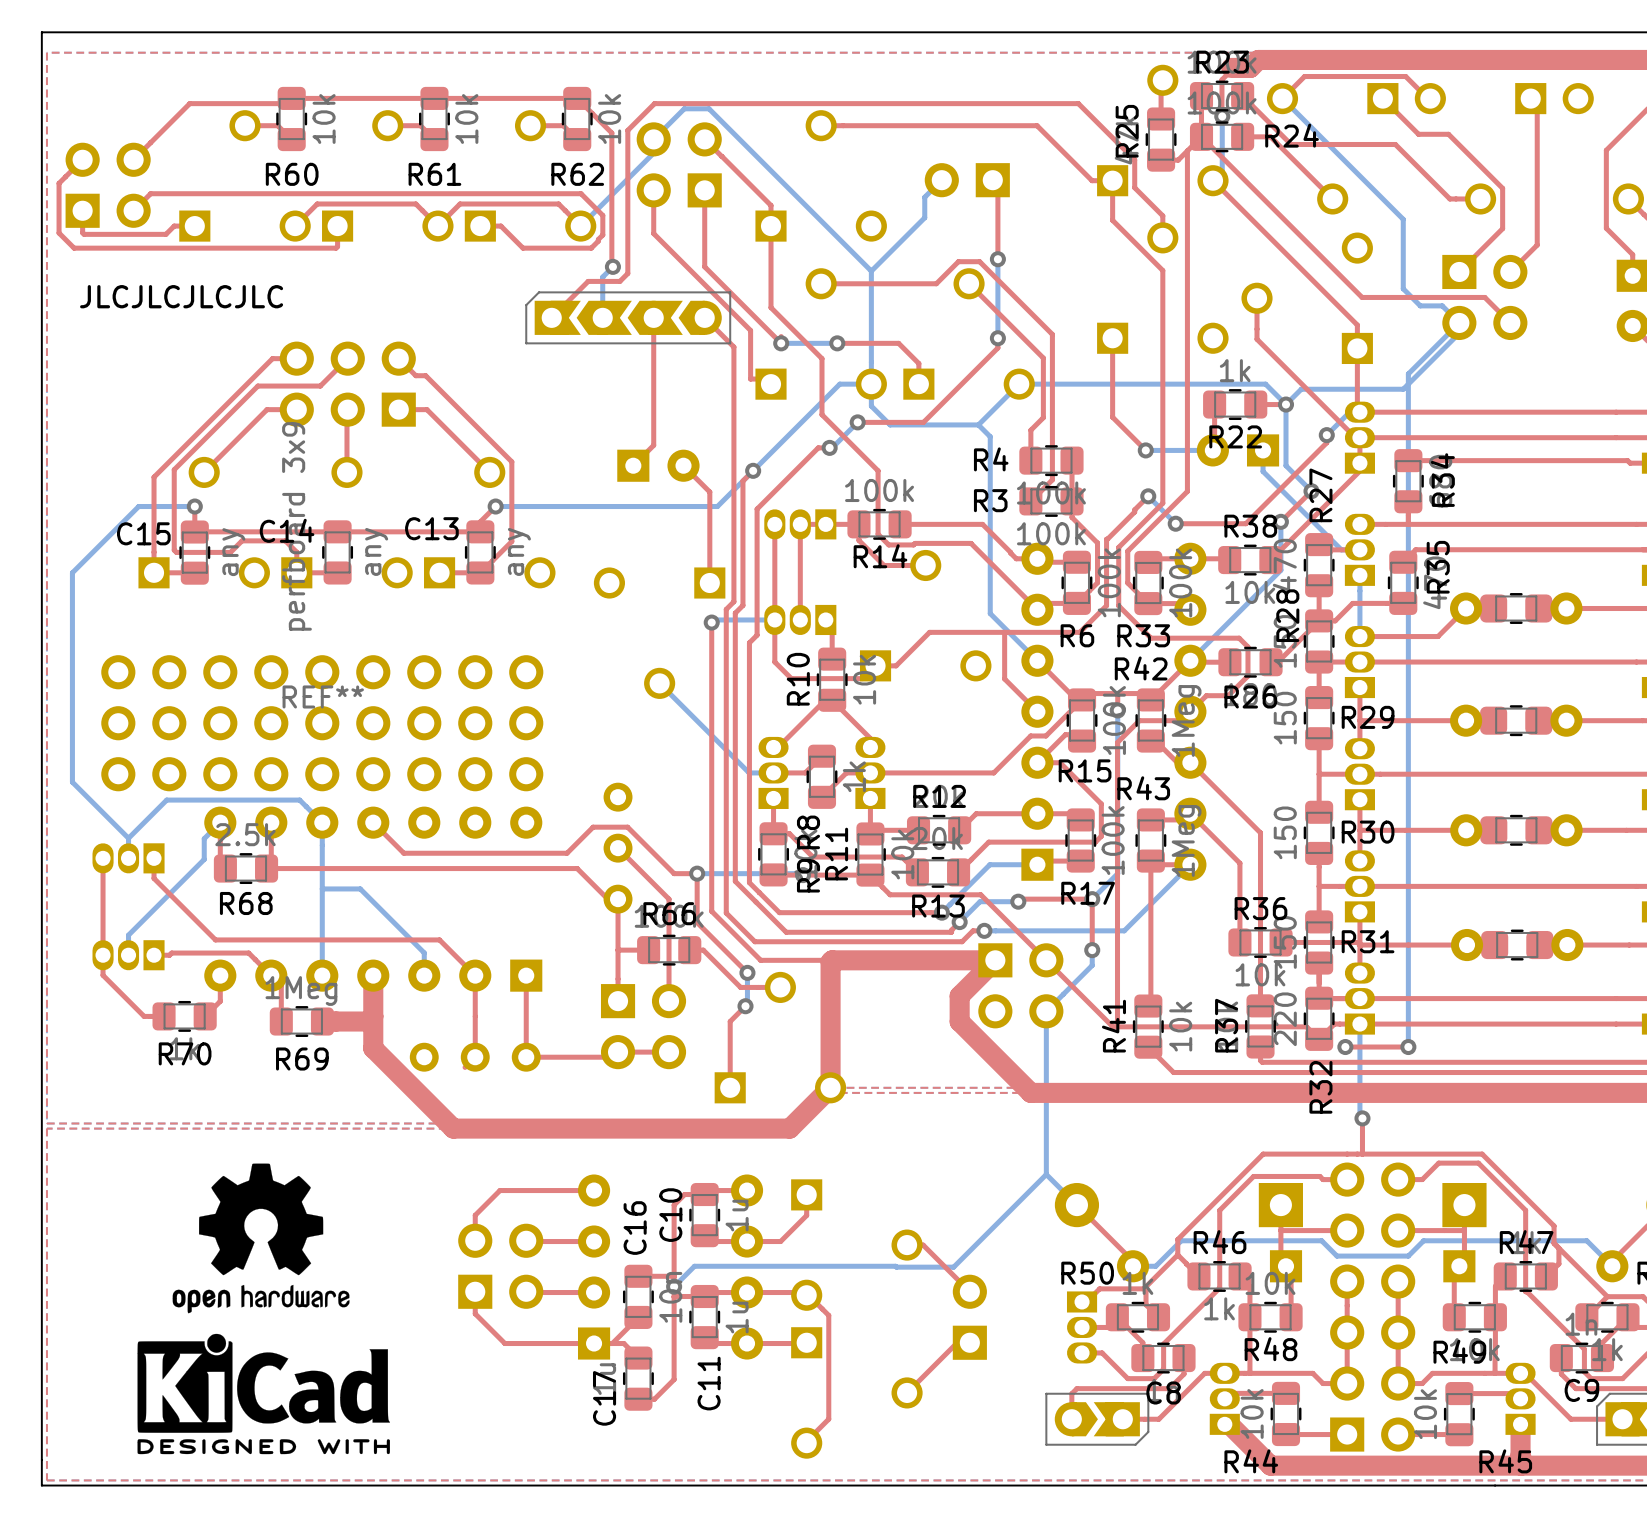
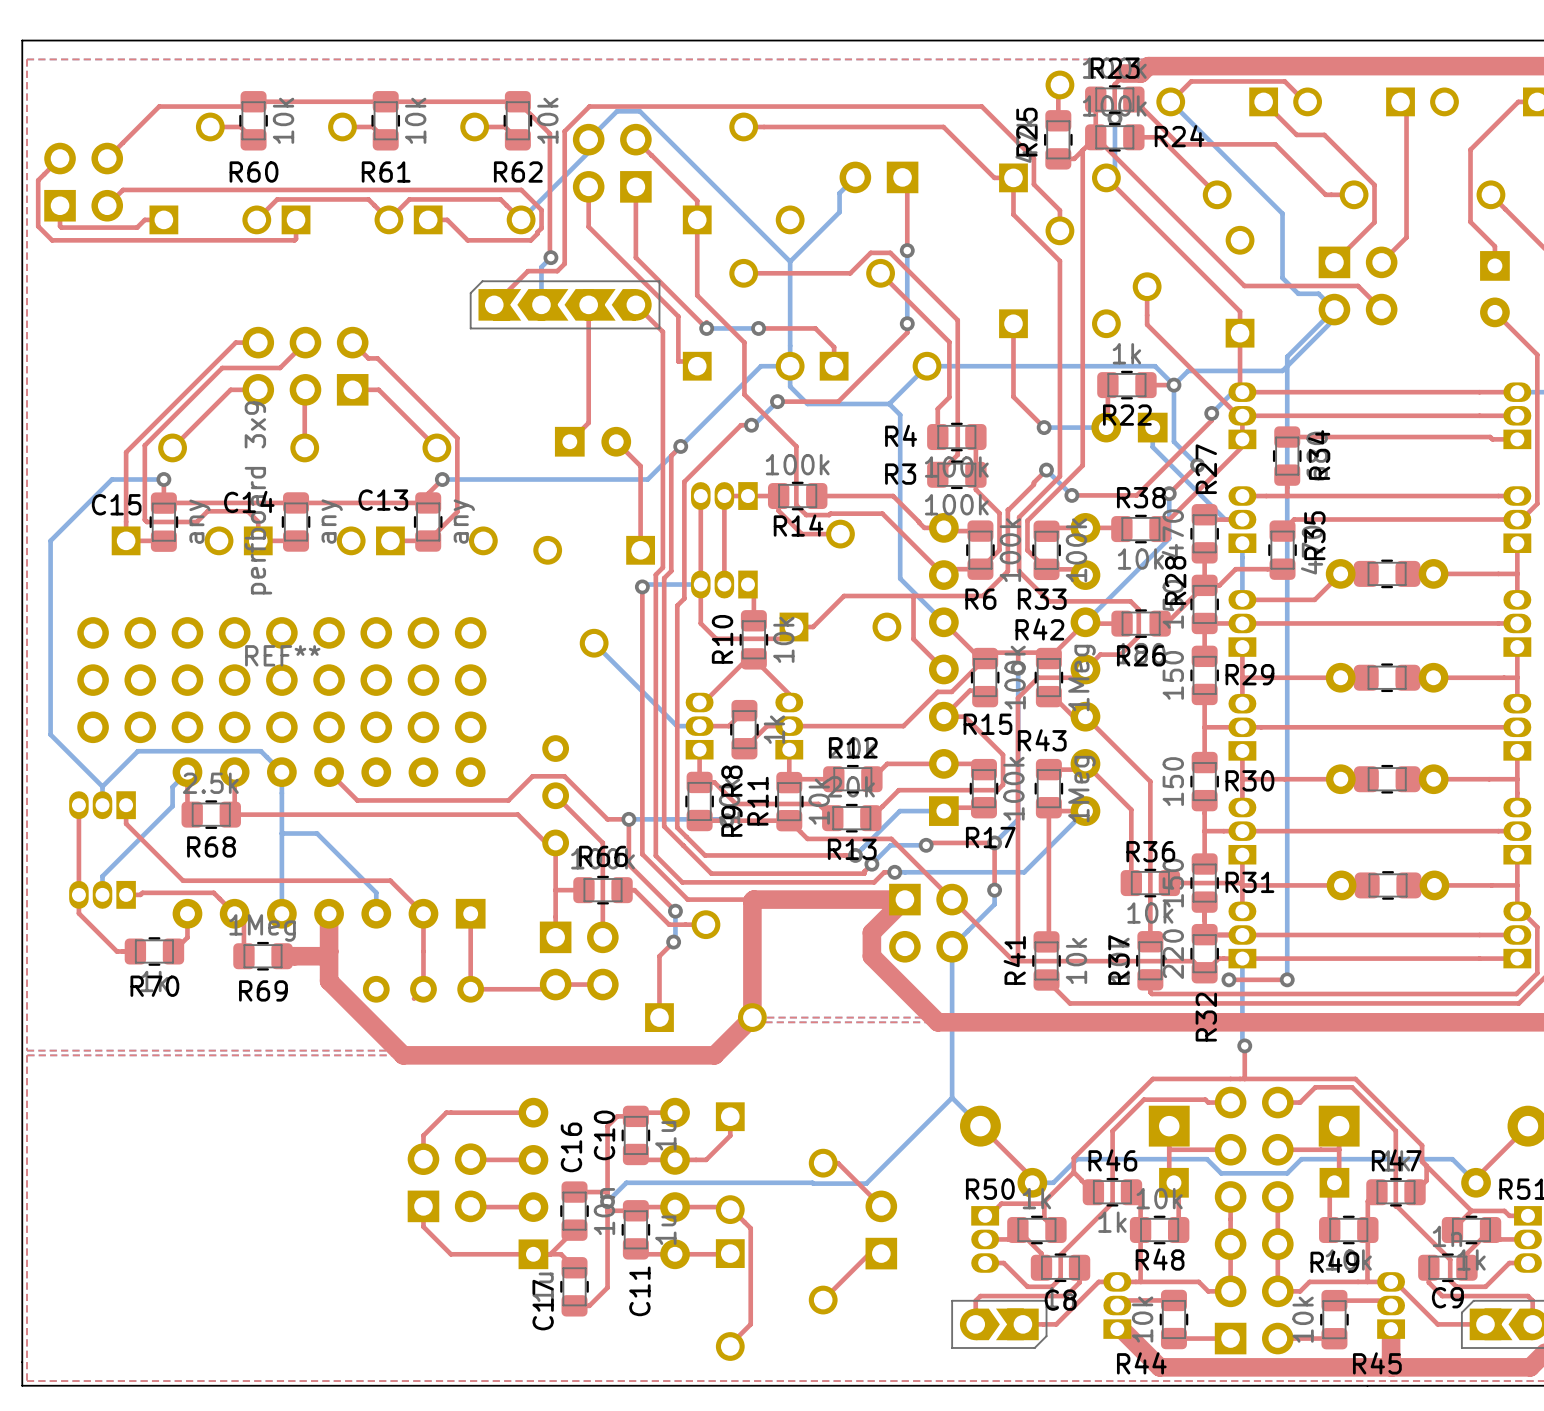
text: JLCJLCJLCJLC (181, 296) -> none
drawing: [137, 1163, 390, 1455] -> none

